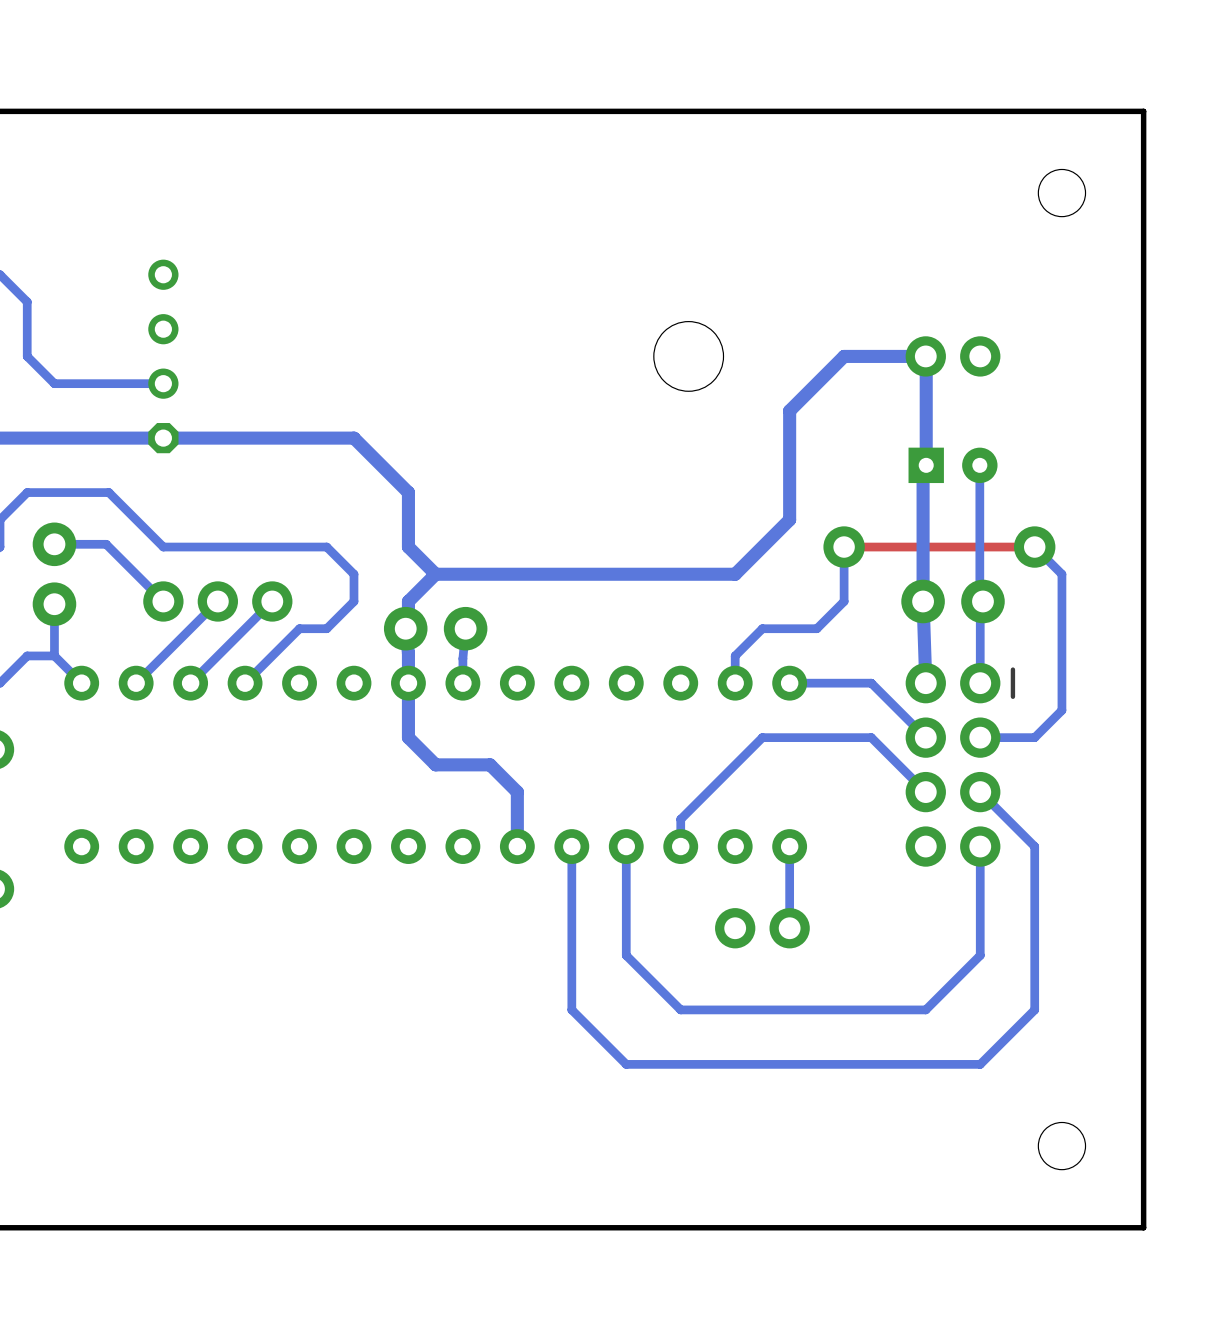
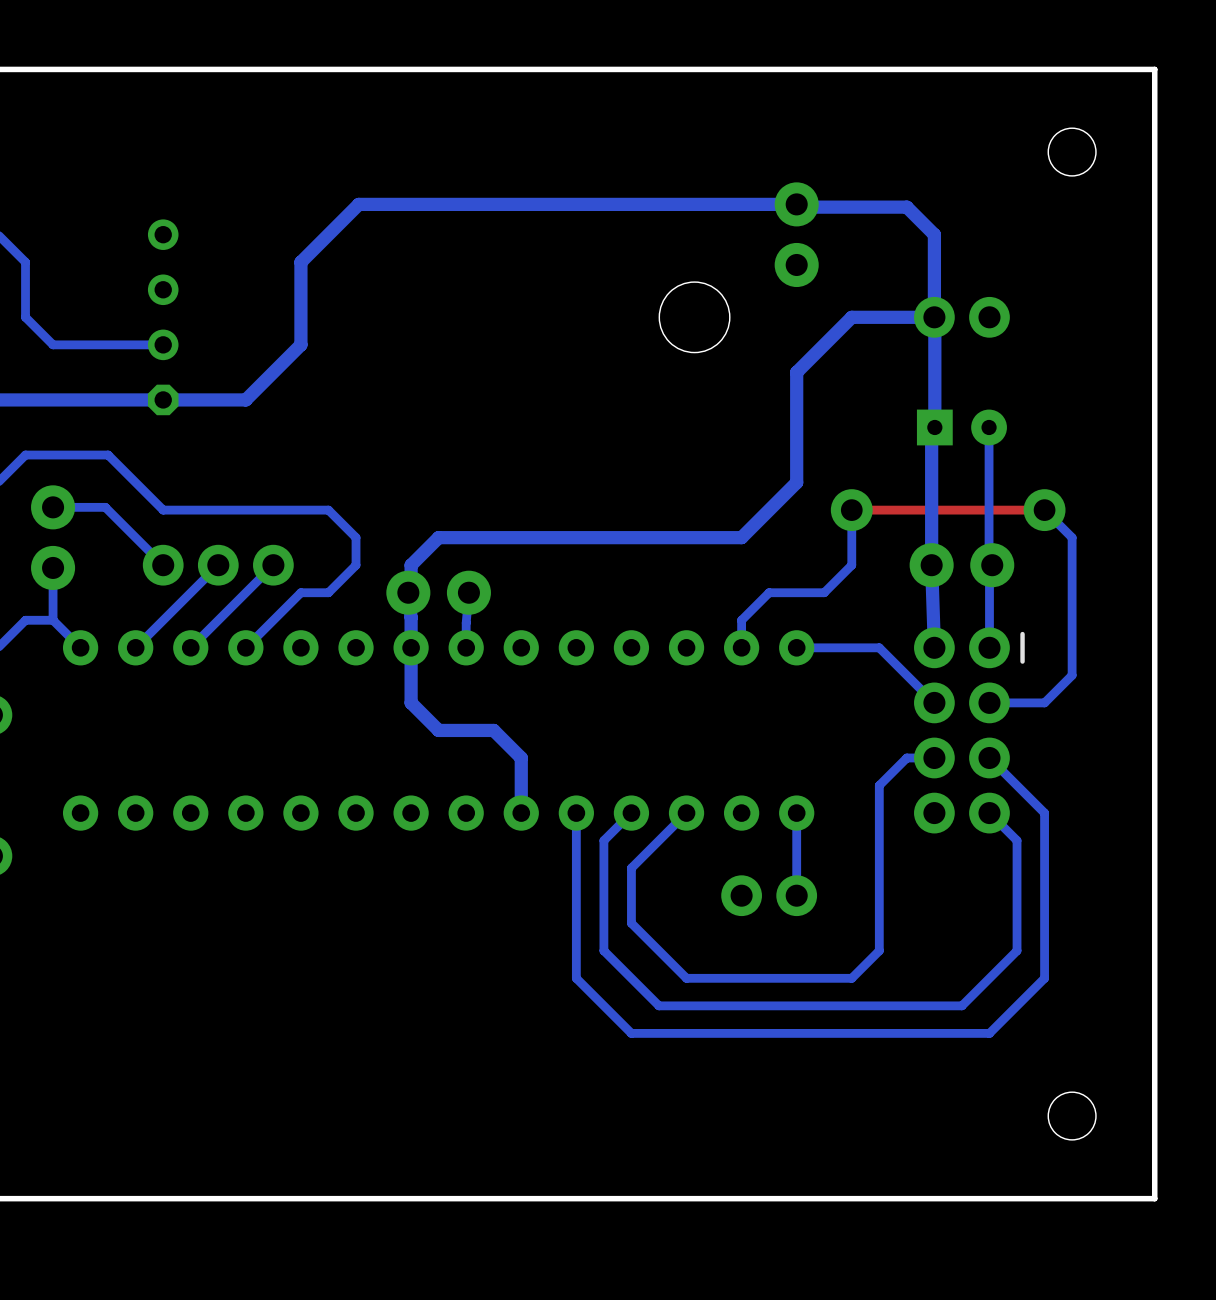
part: none -> (796, 234)
bottom track: (245, 438) (353, 438) (408, 492) (408, 547) (435, 574) -> (245, 399) (300, 344) (300, 262) (358, 204) (796, 204) (799, 207) (906, 207) (934, 234) (934, 317)
bottom track: (925, 792) (871, 737) (762, 737) (680, 819) (680, 846) -> none
bottom track: (626, 846) (626, 901) -> (686, 813) (631, 868)
bottom track: (980, 846) (980, 955) (925, 1009) (844, 1009) -> (934, 757) (906, 757) (879, 785) (879, 950) (851, 978)
bottom track: none -> (989, 813) (1017, 840) (1017, 950) (961, 1005) (658, 1005) (603, 950) (603, 840) (631, 813)

